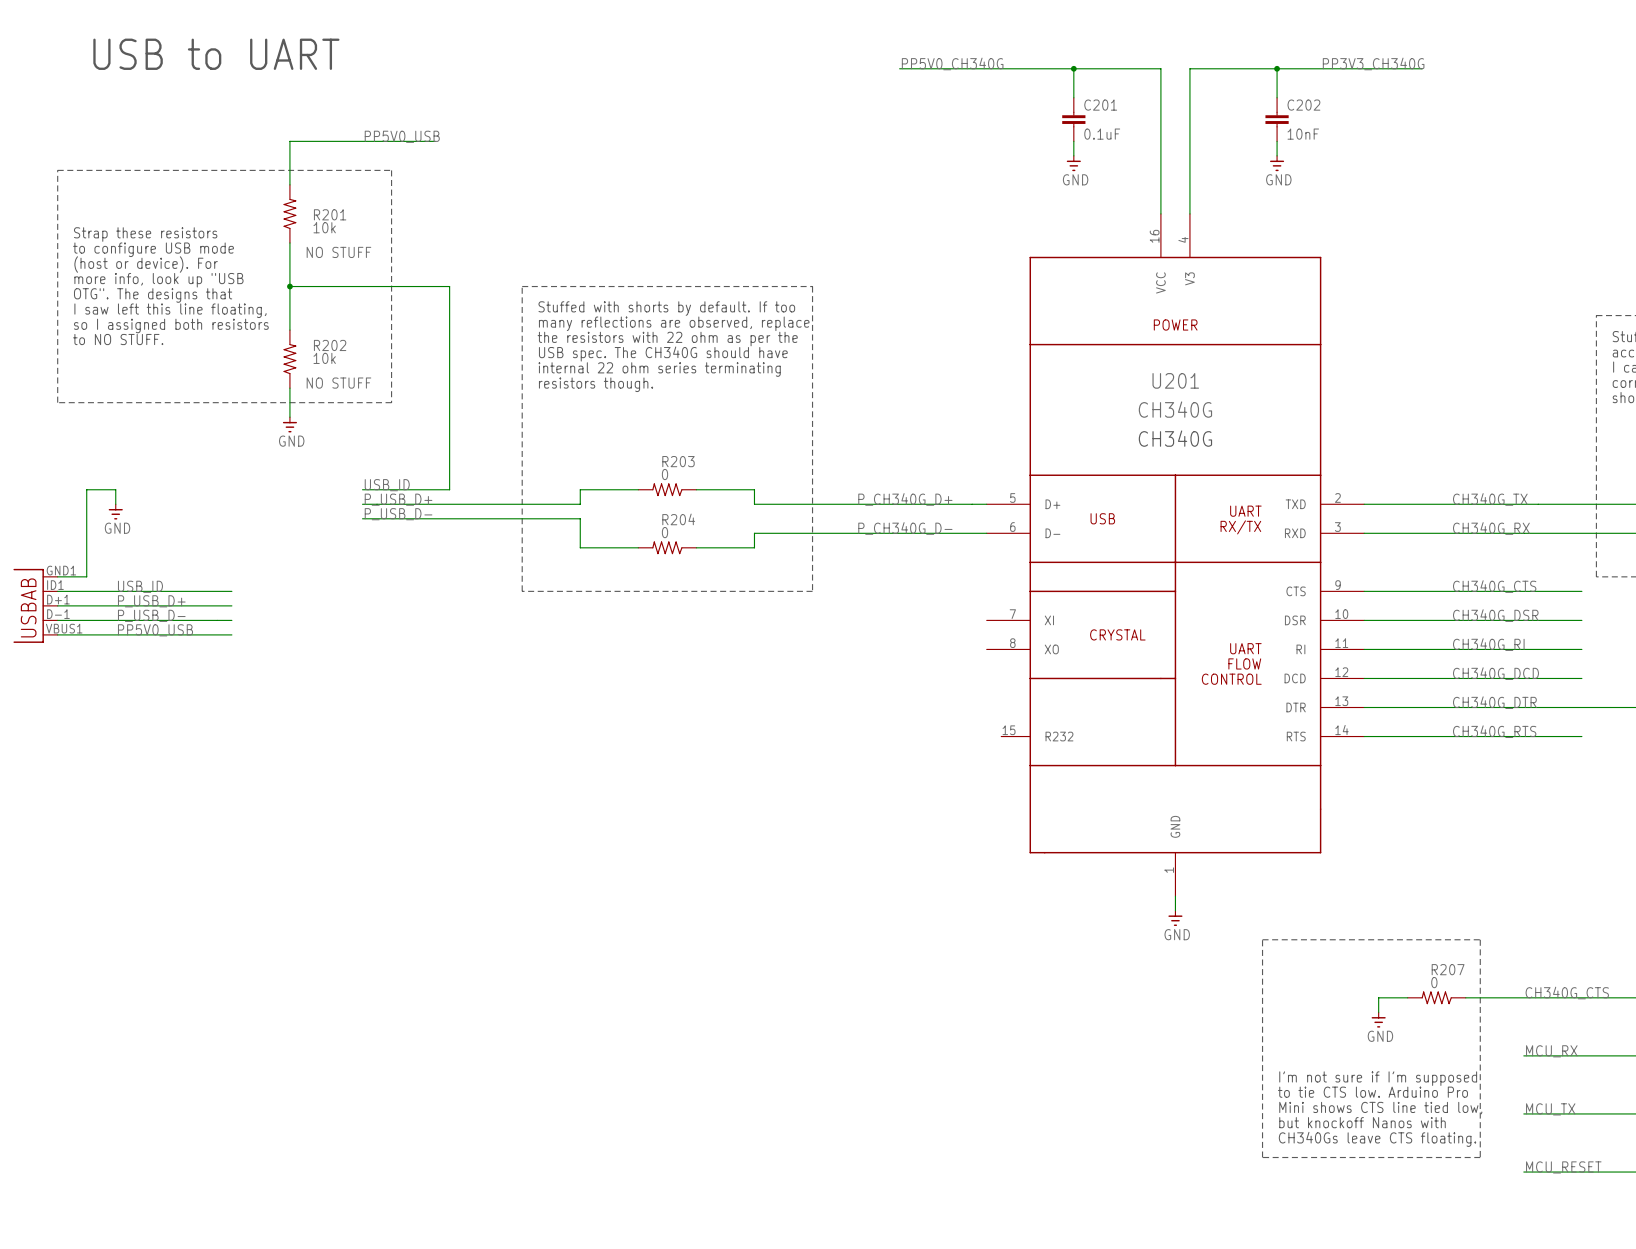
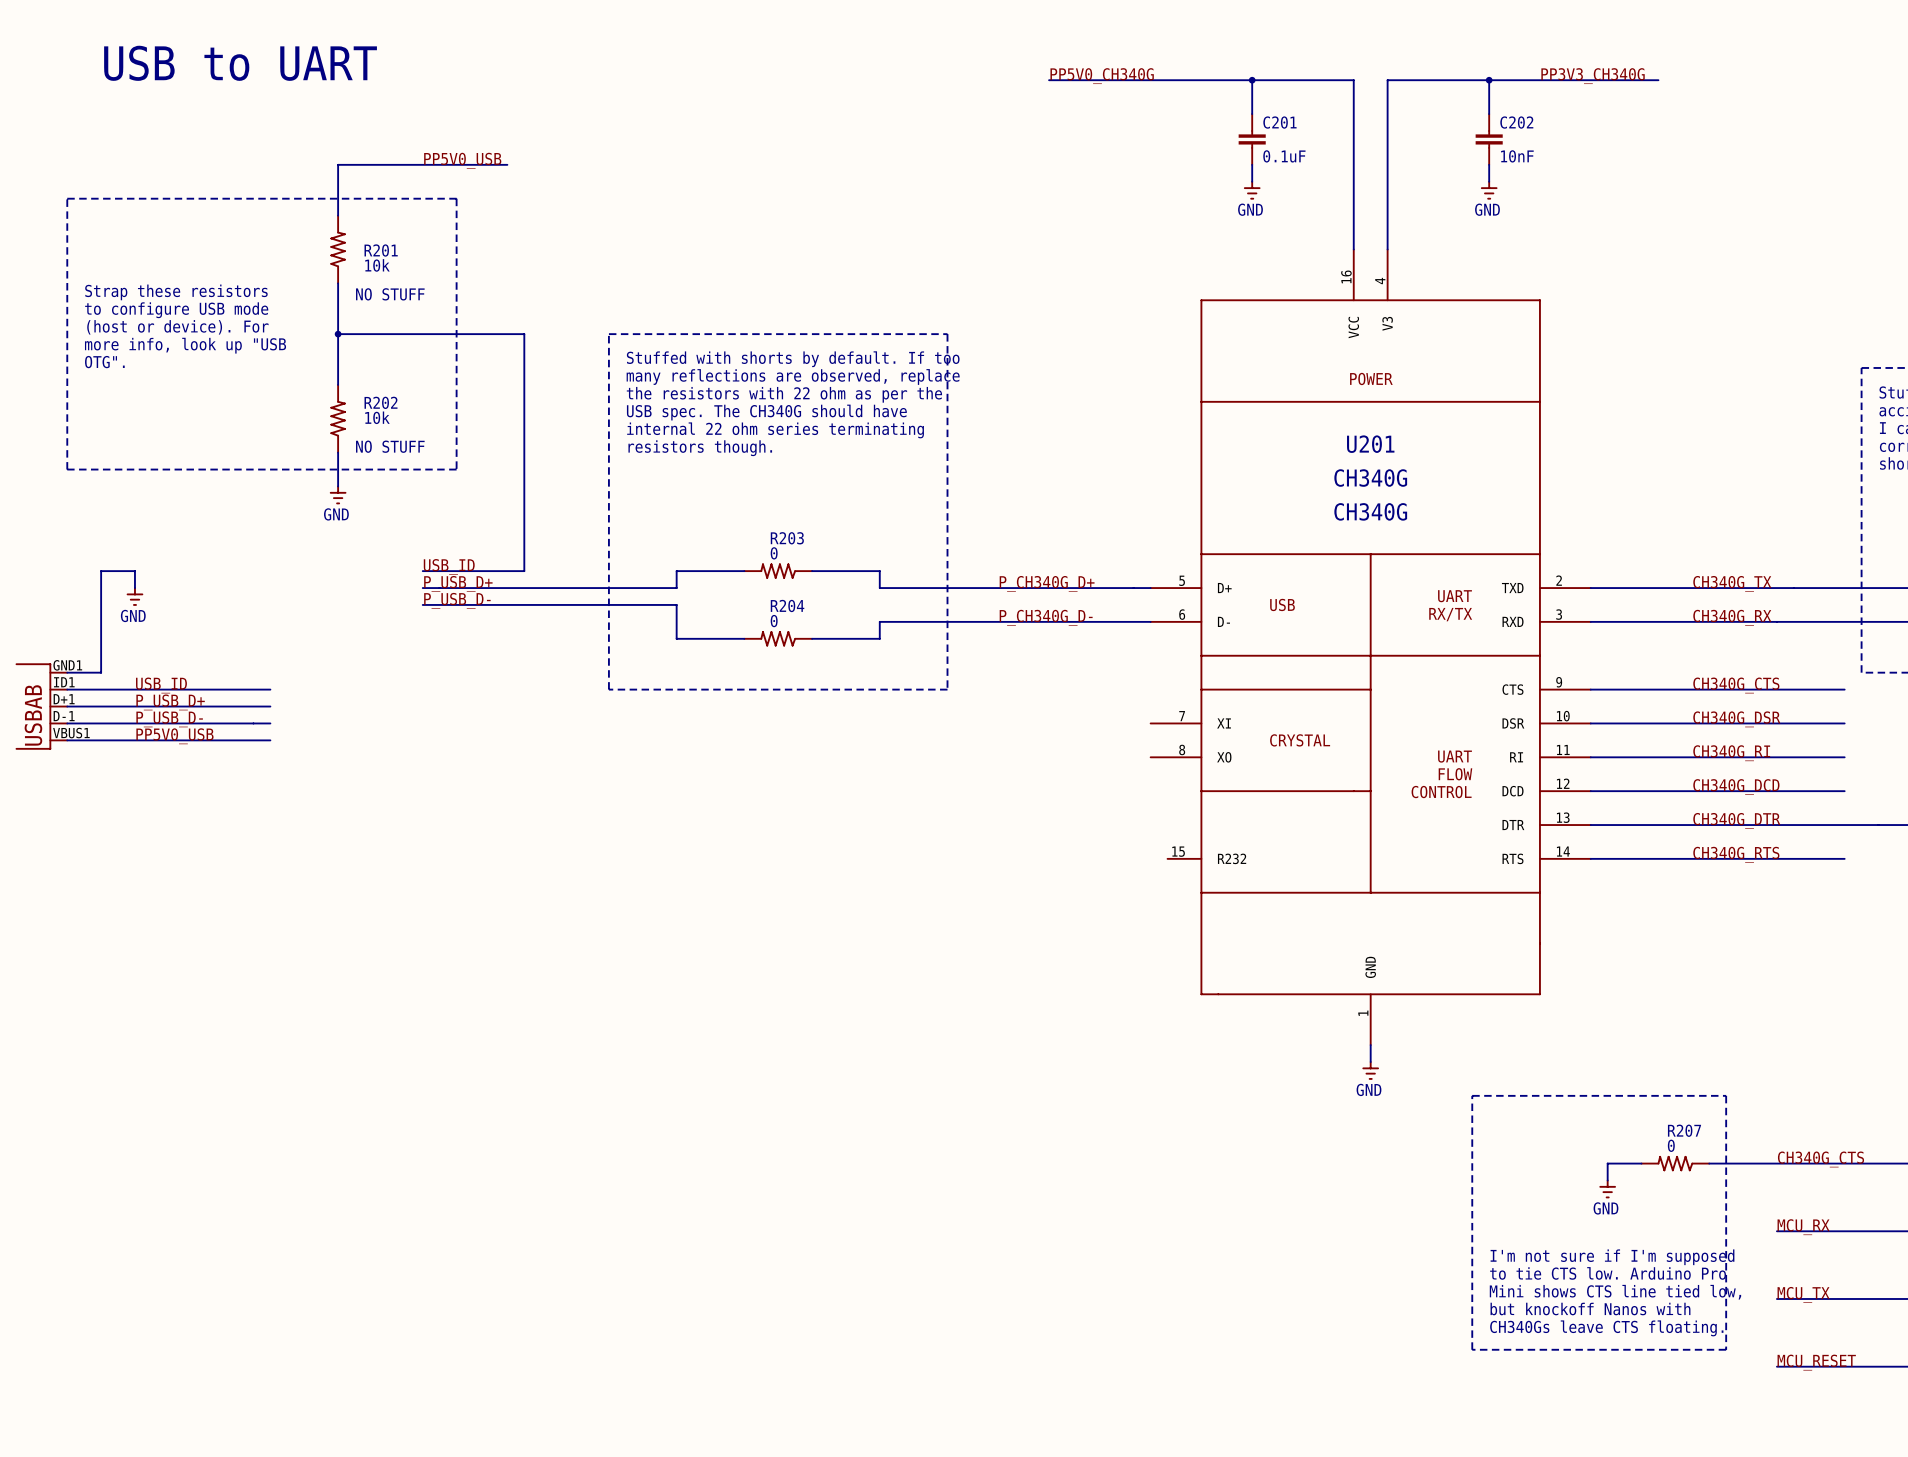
text: Strap these resistors (145, 234) -> none
text: to configure USB mode (153, 249) -> Strap these resistors (176, 292)
text: (host or device). For (146, 264) -> to configure USB mode (176, 310)
text: more info, look up "USB (158, 280) -> (host or device). For (177, 327)
text: OTG". The designs that (153, 295) -> more info, look up "USB (185, 345)
text: I saw left this line floating, (170, 310) -> OTG". (104, 362)
text: so I assigned both resistors (171, 325) -> none
text: to NO STUFF. (118, 339) -> none

